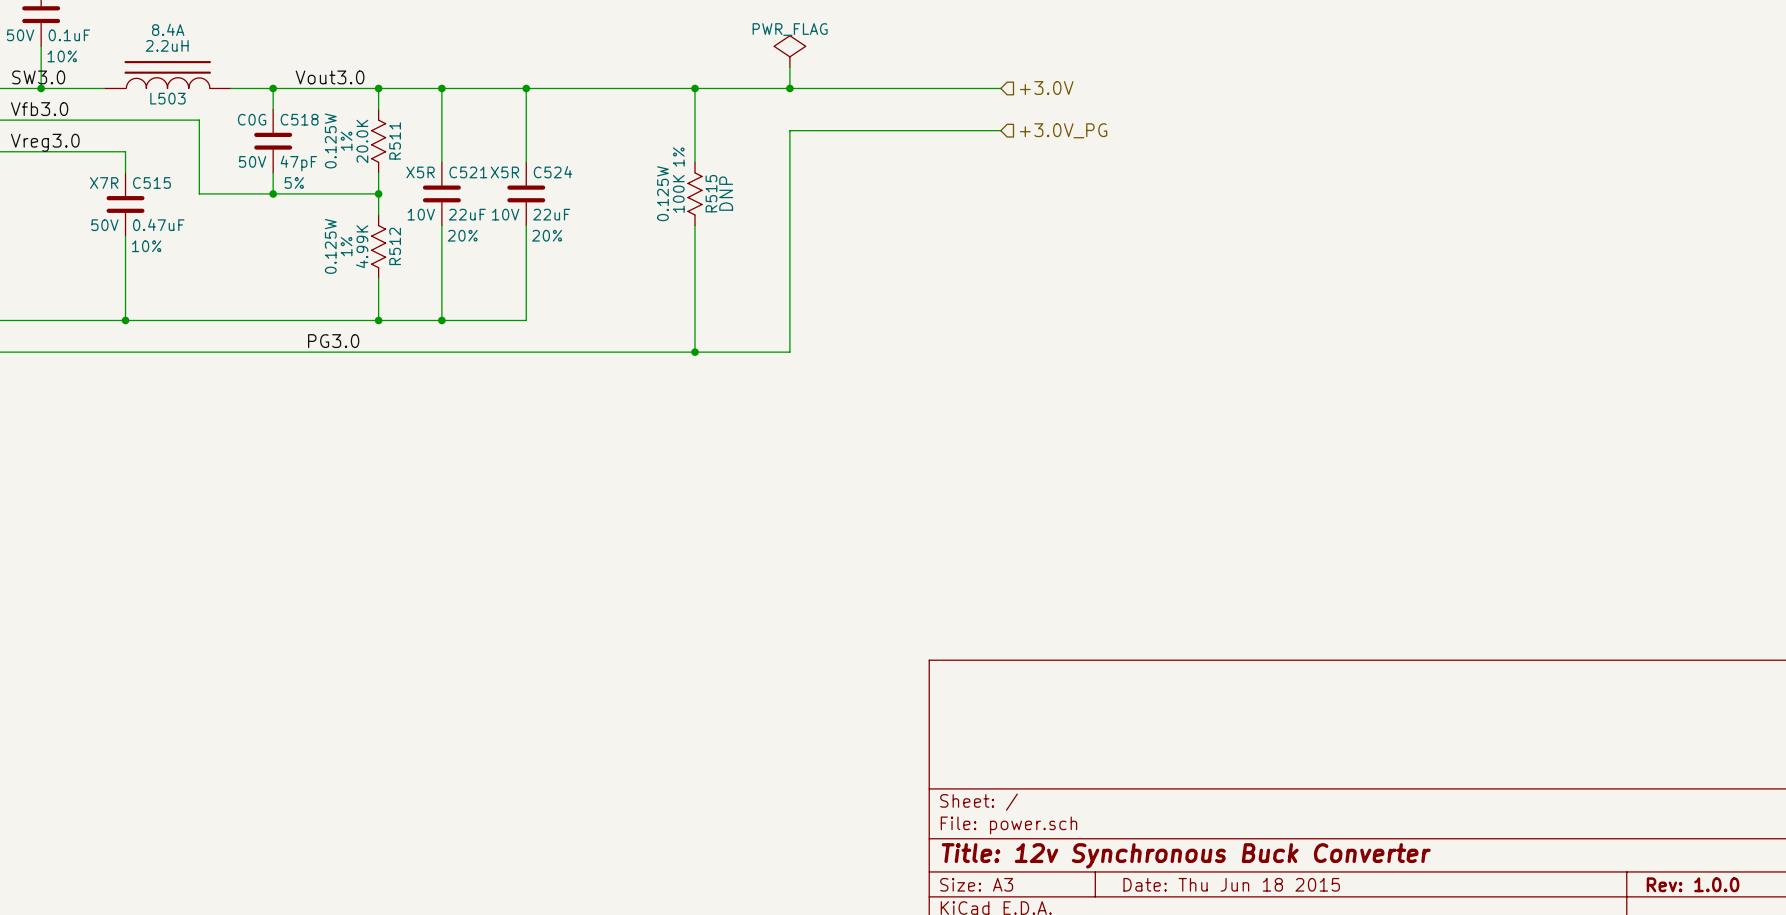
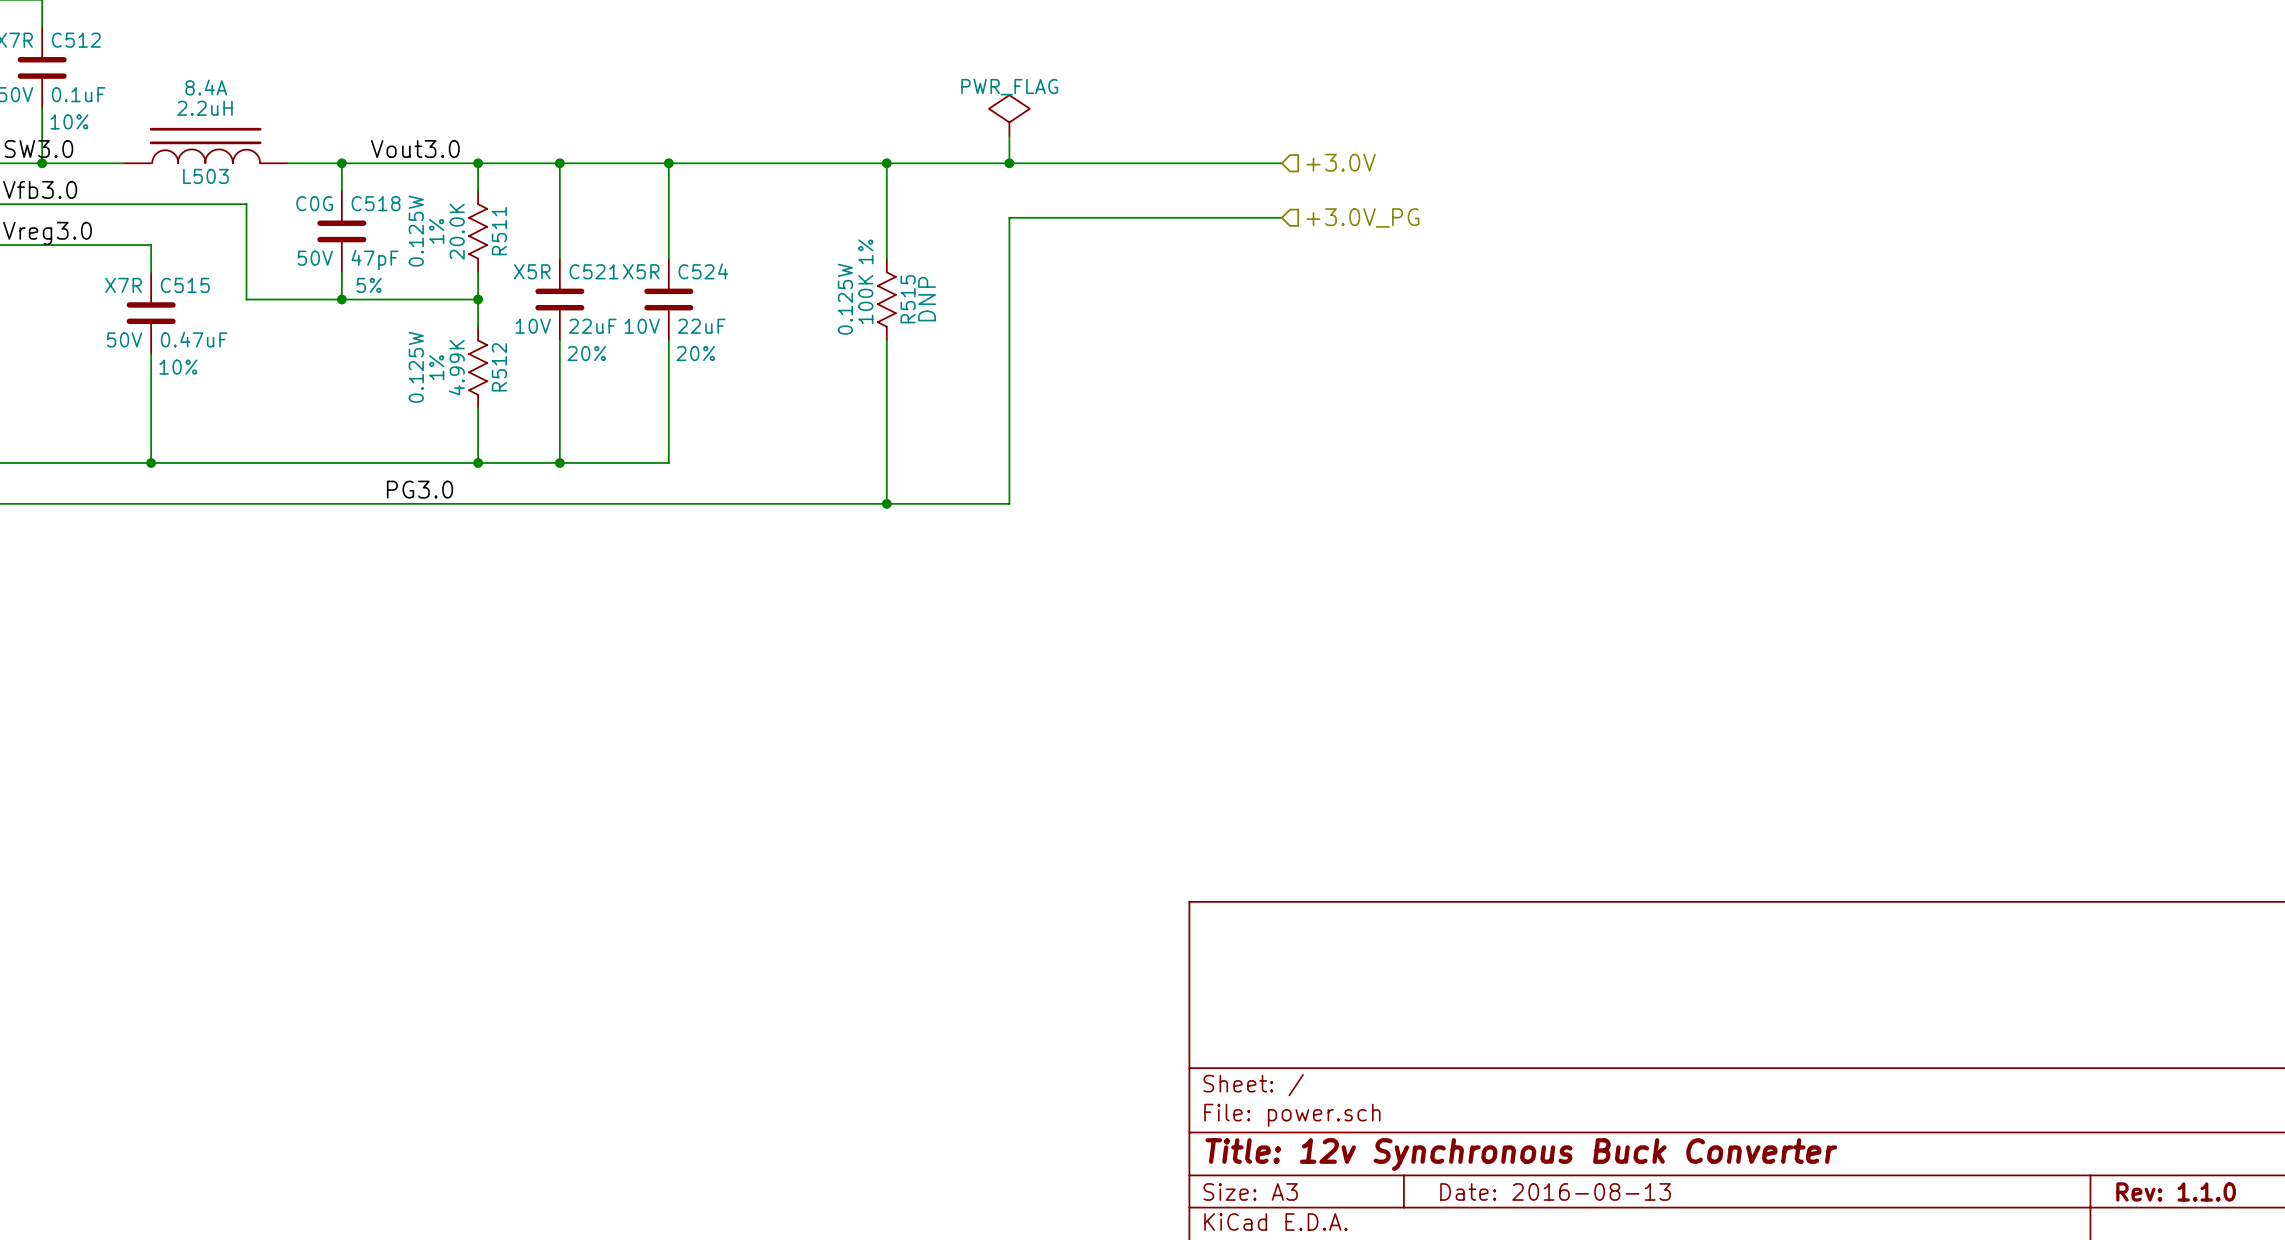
title block: Date: Thu Jun 18 2015 (1231, 884) -> Date: 2016-08-13 (1555, 1191)
title block: Rev: 1.0.0 (1693, 884) -> Rev: 1.1.0 (2176, 1191)

